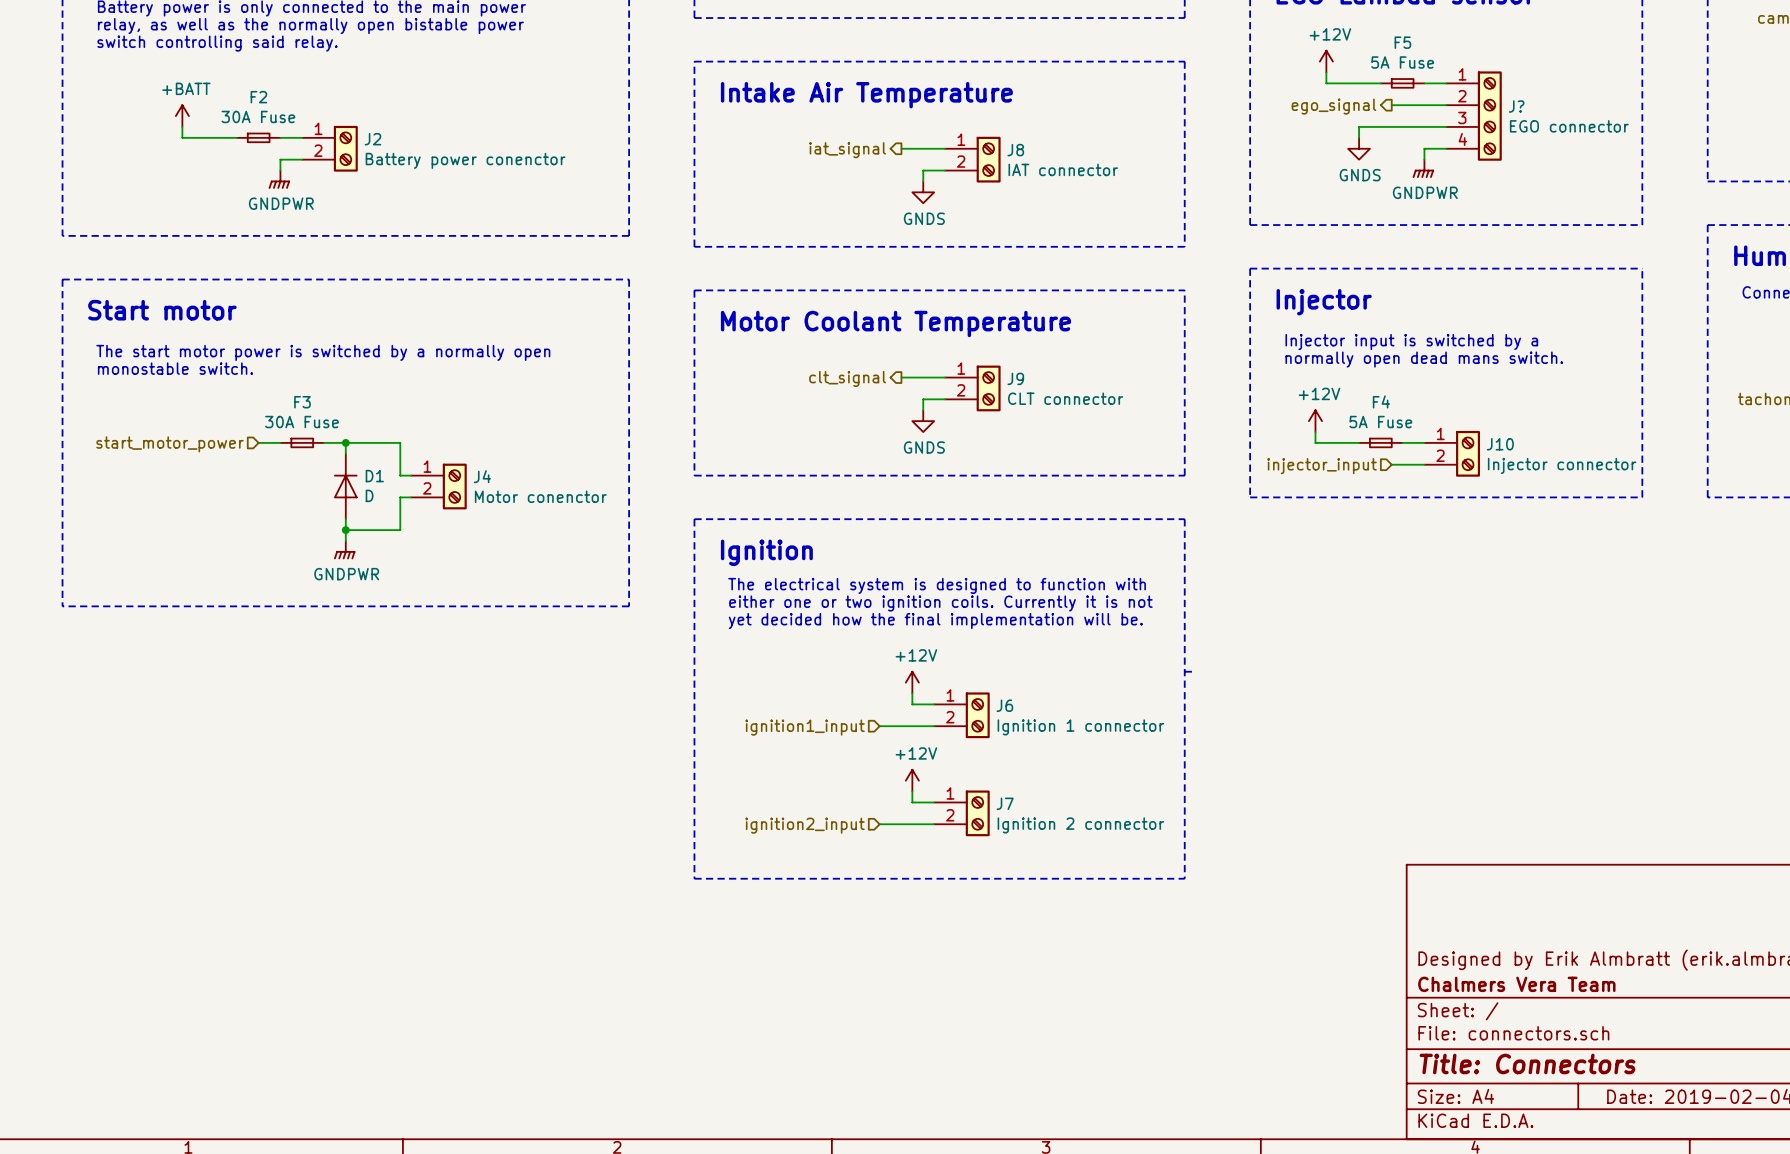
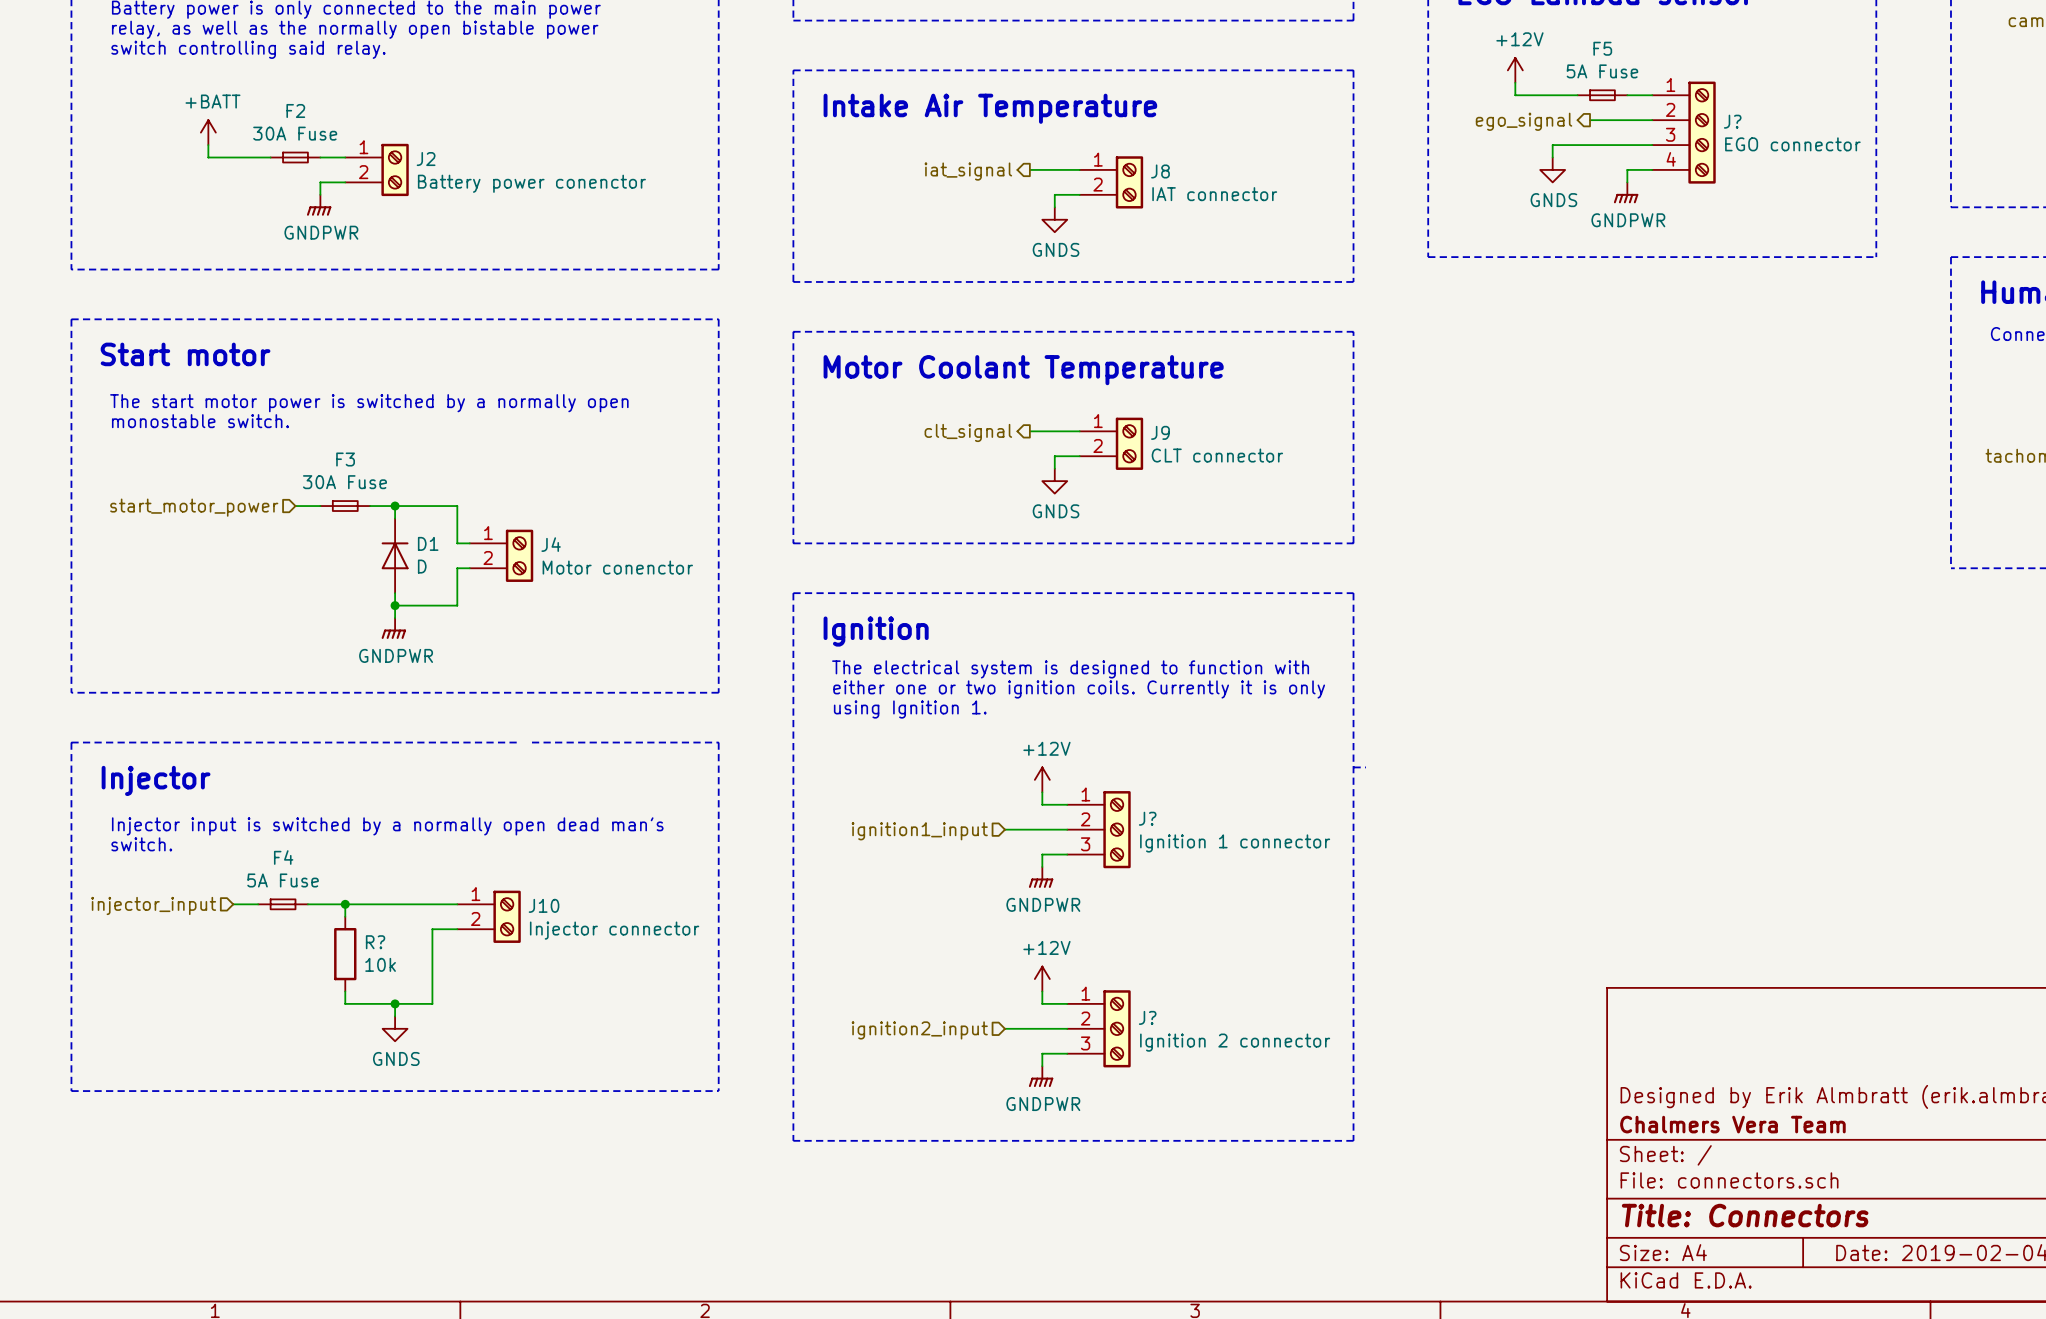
line: (1250, 268) (1642, 268) (1642, 497) (1250, 497) (1250, 268) -> none
text: Injector (1324, 302) -> none
text: Injector input is switched by a (1411, 342) -> none
text: normally open dead mans switch. (1424, 359) -> none
power symbol: +12V (1315, 421) -> none
wire: (1315, 432) (1315, 442) (1359, 442) -> none
F4 position: (1380, 442) -> (283, 904)
wire: (1402, 442) (1424, 442) -> none
J10 position: (1452, 453) -> (489, 916)
wire: (1391, 464) (1424, 464) -> none
hierarchical label: injector_input (1322, 466) -> none
text: either one or two ignition coils. Currently it is not (940, 603) -> either one or two ignition coils. Currently it is only (1079, 689)
text: yet decided how the final implementation will be. (935, 621) -> using Ignition 1. (910, 709)
line: none -> (519, 742) (71, 742) (71, 1091) (718, 1091) (718, 742) (531, 742)
text: none -> Injector (156, 780)
J6: Ignition 1 connector (961, 715) -> none
text: none -> Injector input is switched by a normally open dead man's (387, 826)
J?: none -> Ignition 1 connector (1098, 829)
text: none -> switch. (141, 844)
power symbol: none -> GNDPWR (1041, 877)
power symbol position: +12V (912, 780) -> +12V (1042, 979)
wire: none -> (233, 904) (258, 904)
wire: none -> (307, 904) (457, 904)
wire: none -> (345, 904) (345, 916)
junction: none -> (345, 904)
wire: (912, 791) (912, 802) (934, 802) -> (1042, 991) (1042, 1003) (1067, 1003)
hierarchical label: none -> injector_input (153, 905)
wire: none -> (457, 929) (432, 929) (432, 1003) (345, 1003) (345, 991)
J7: Ignition 2 connector (961, 813) -> none
wire: (879, 824) (934, 824) -> (1004, 1028) (1067, 1028)
hierarchical label position: ignition2_input (805, 825) -> ignition2_input (919, 1030)
R?: none -> 10k (345, 954)
wire: none -> (395, 1003) (395, 1016)
junction: none -> (395, 1003)
line: (694, 878) (1184, 878) -> (793, 1003) (793, 1140) (1353, 1140) (1353, 1003)
power symbol: none -> GNDS (395, 1028)
J?: none -> Ignition 2 connector (1098, 1028)
wire: none -> (1067, 1053) (1042, 1053) (1042, 1066)
power symbol: none -> GNDPWR (1041, 1076)

